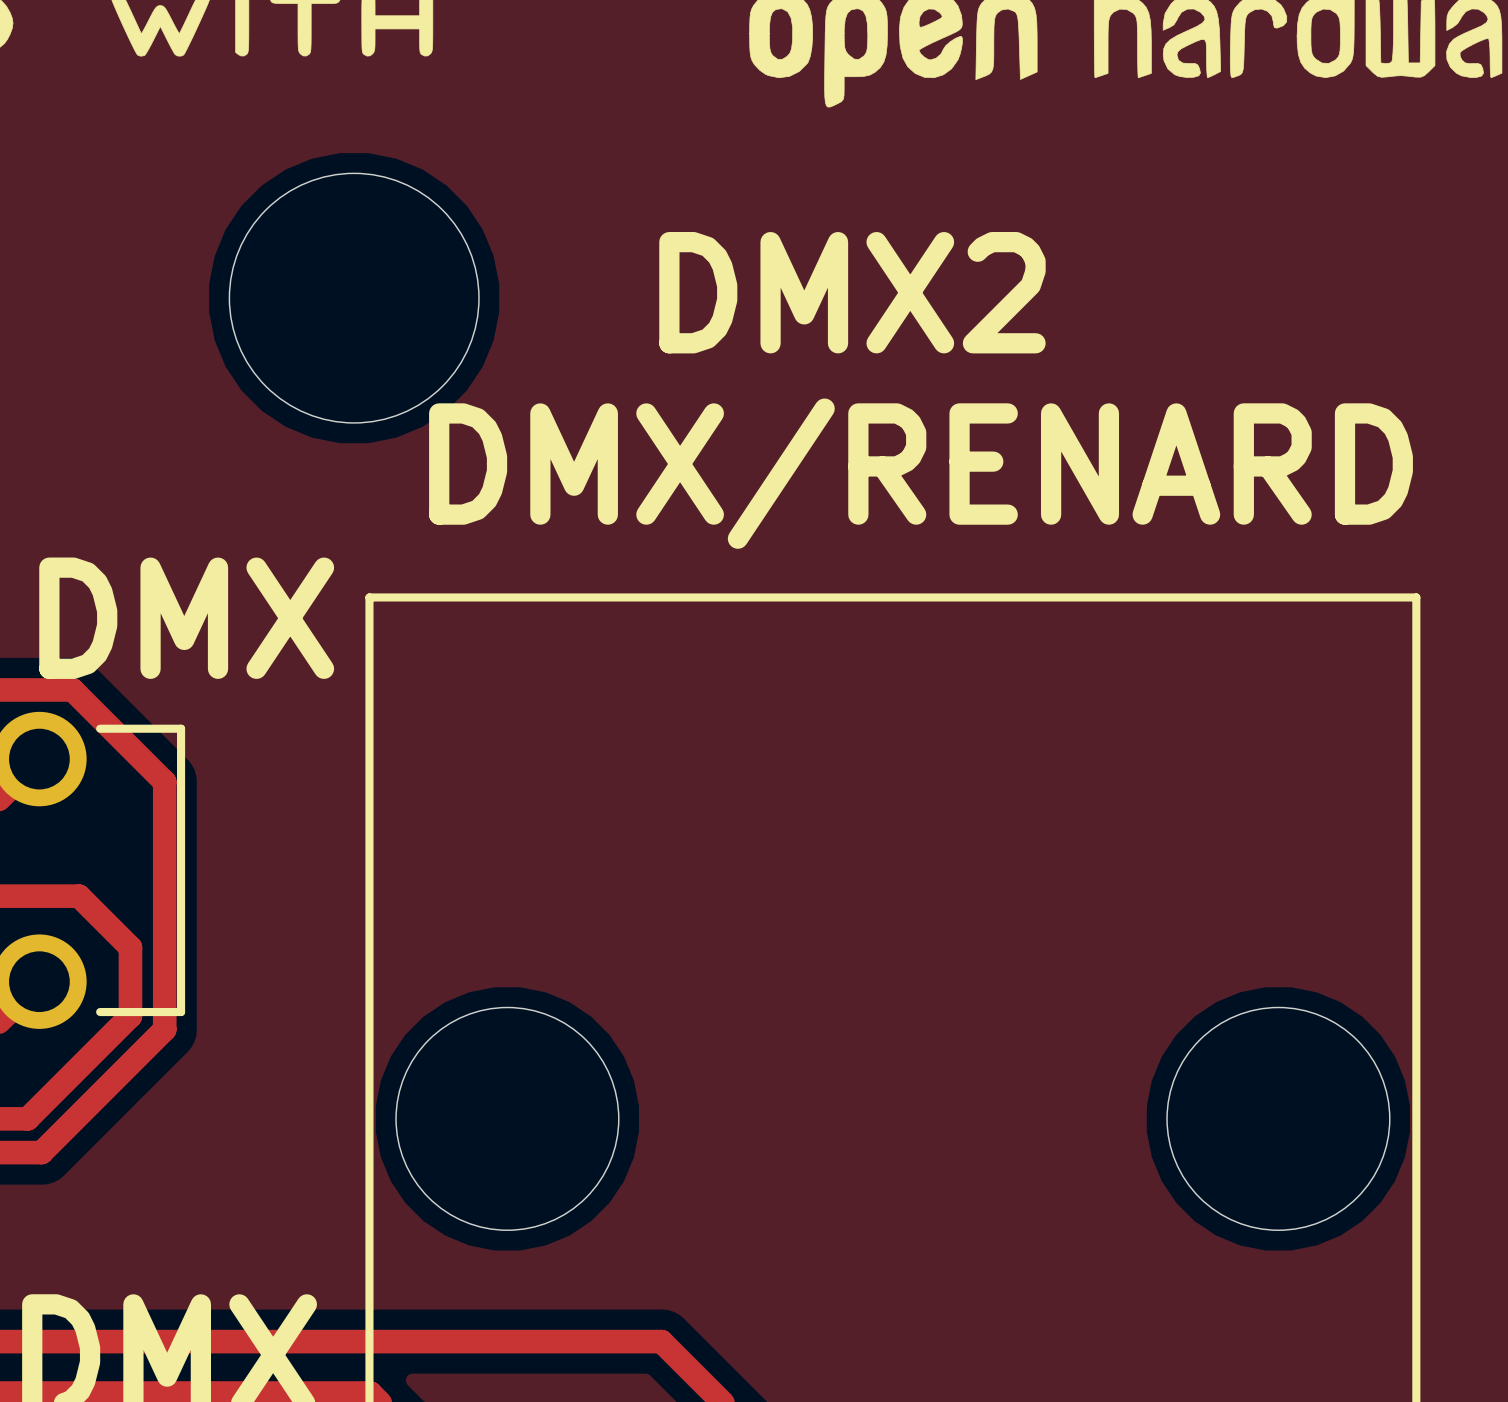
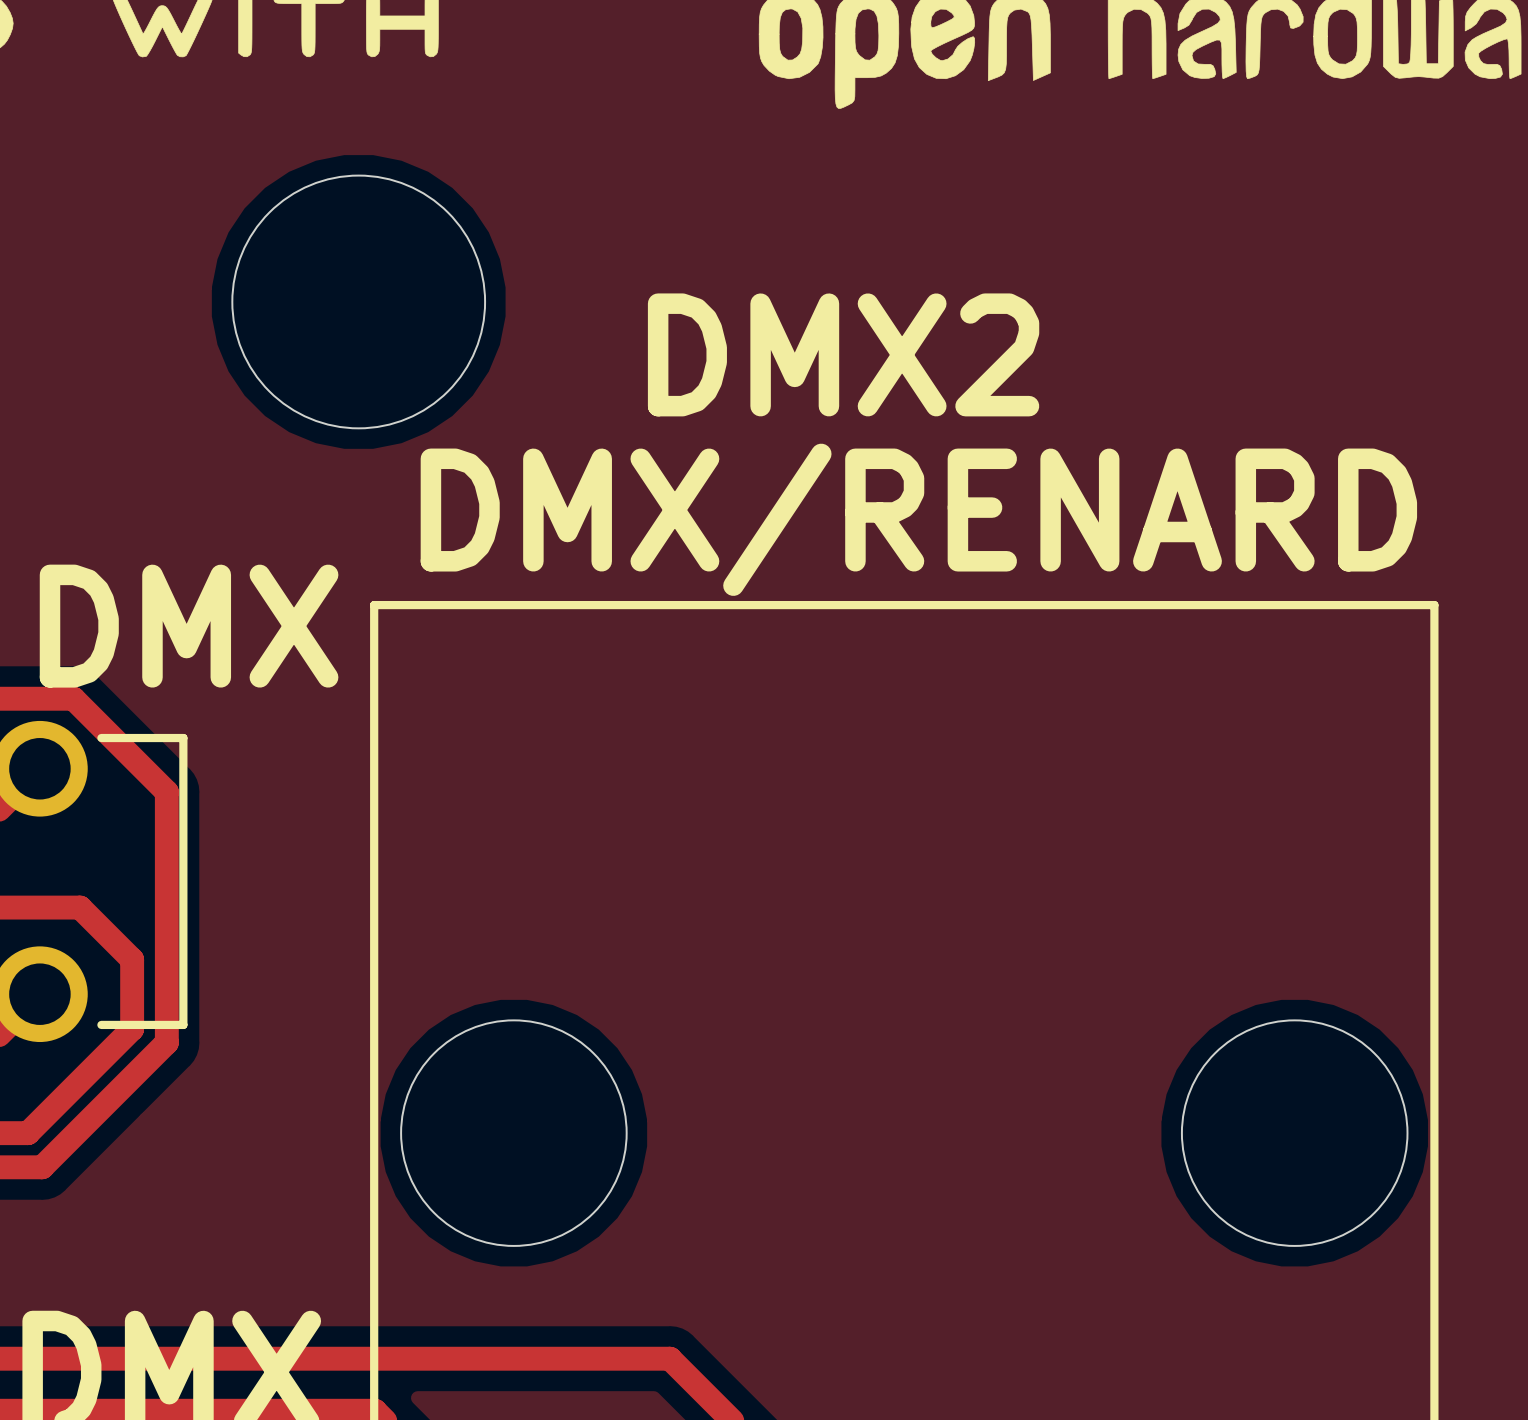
text position: DMX2 (852, 292) -> DMX2 (843, 354)
text position: DMX/RENARD (921, 473) -> DMX/RENARD (918, 519)

